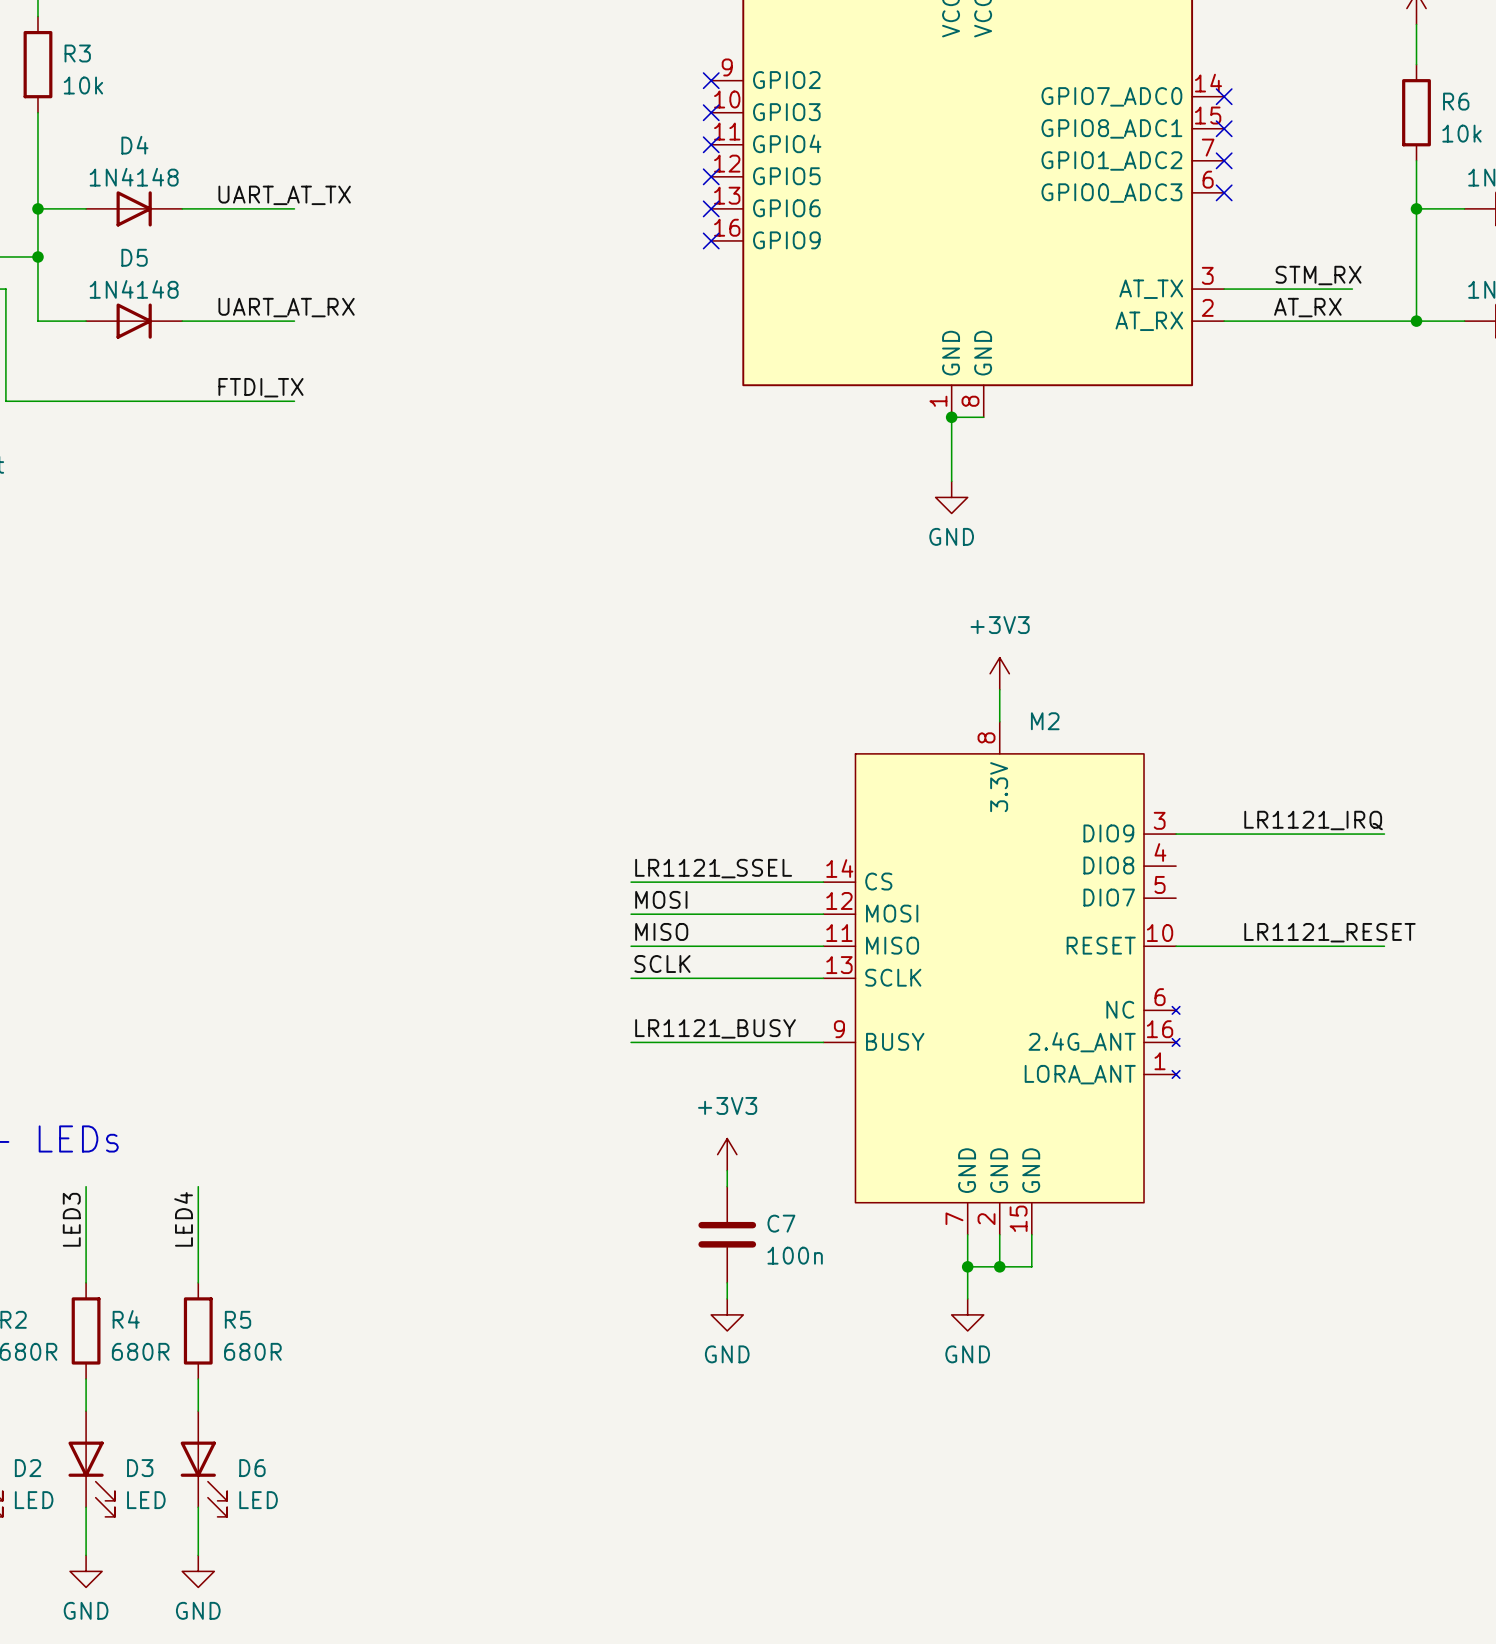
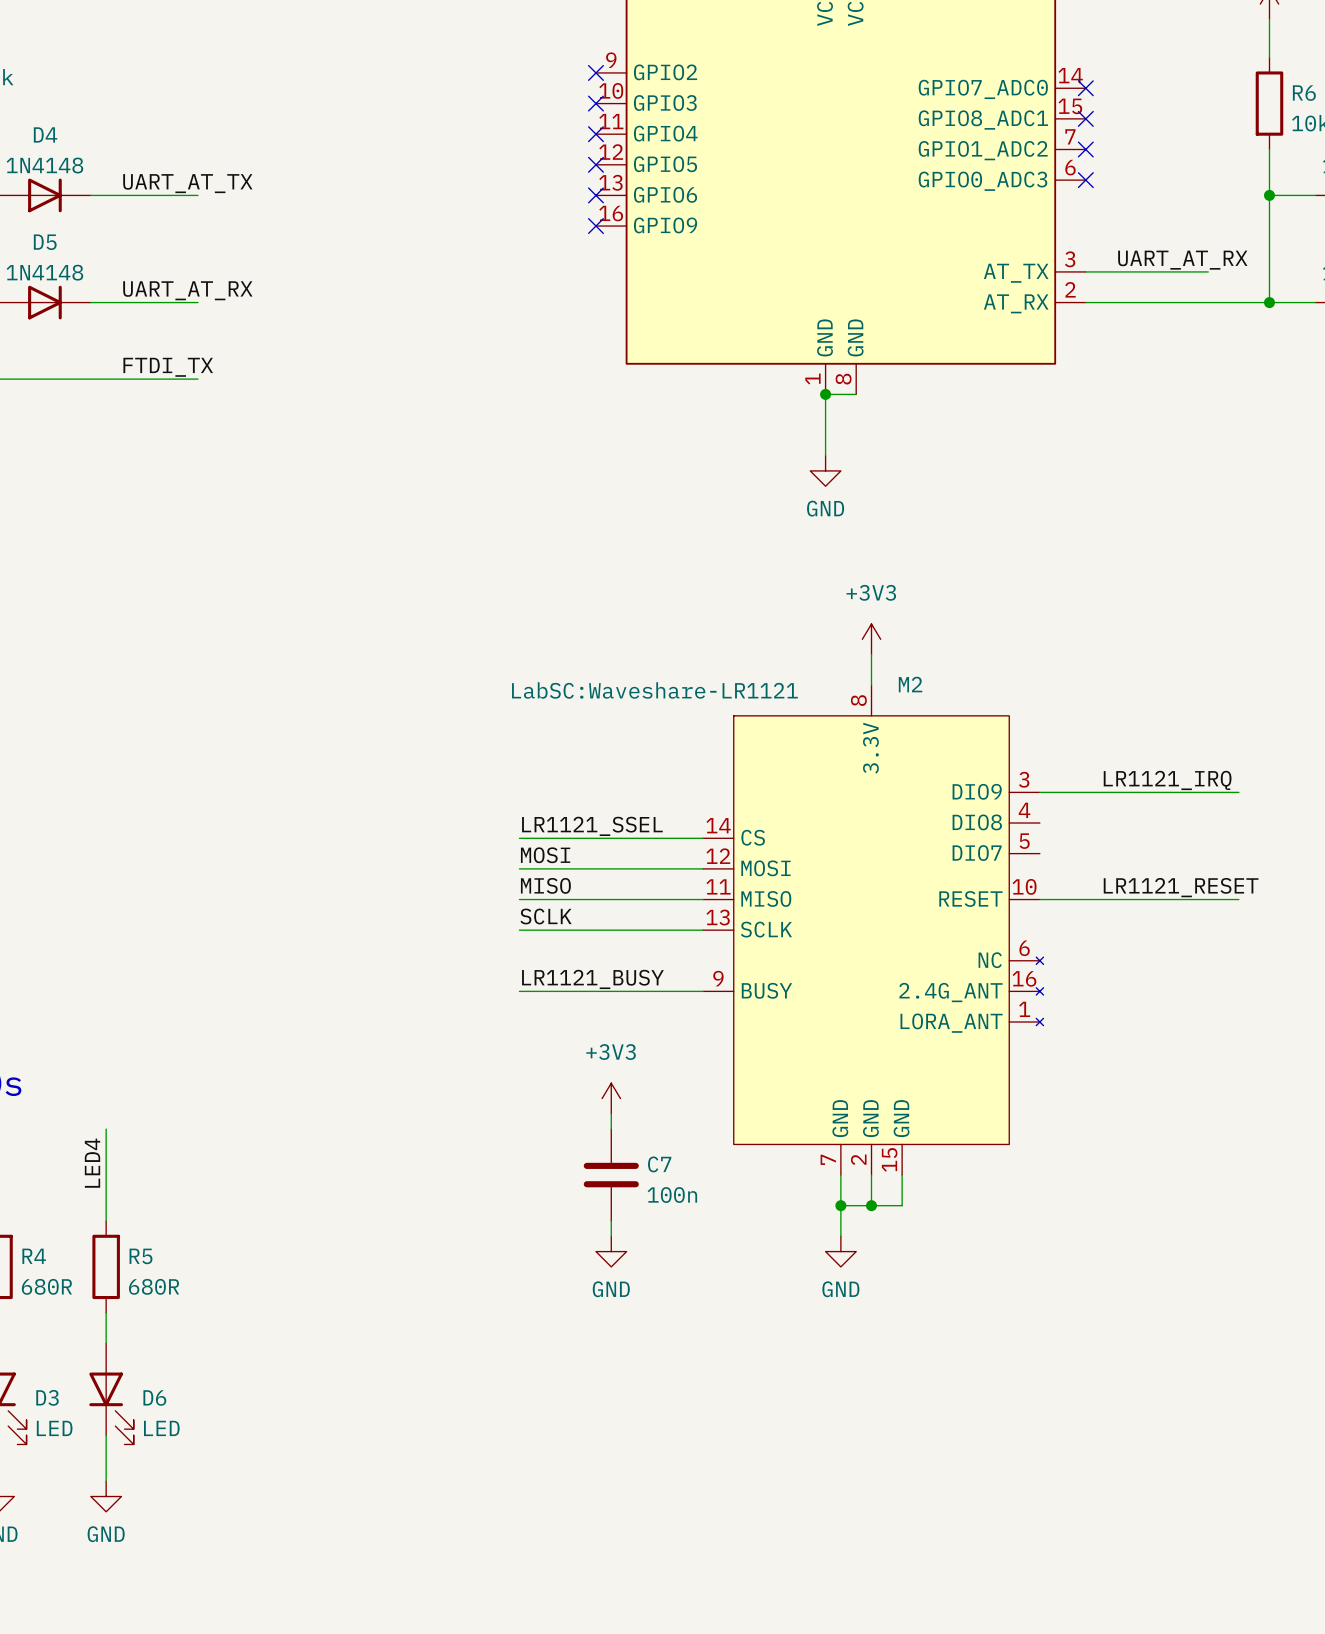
label: STM_RX (1318, 275) -> none
label: AT_RX (1307, 307) -> UART_AT_RX (1182, 260)
M2 text: none -> LabSC:Waveshare-LR1121 (654, 690)

